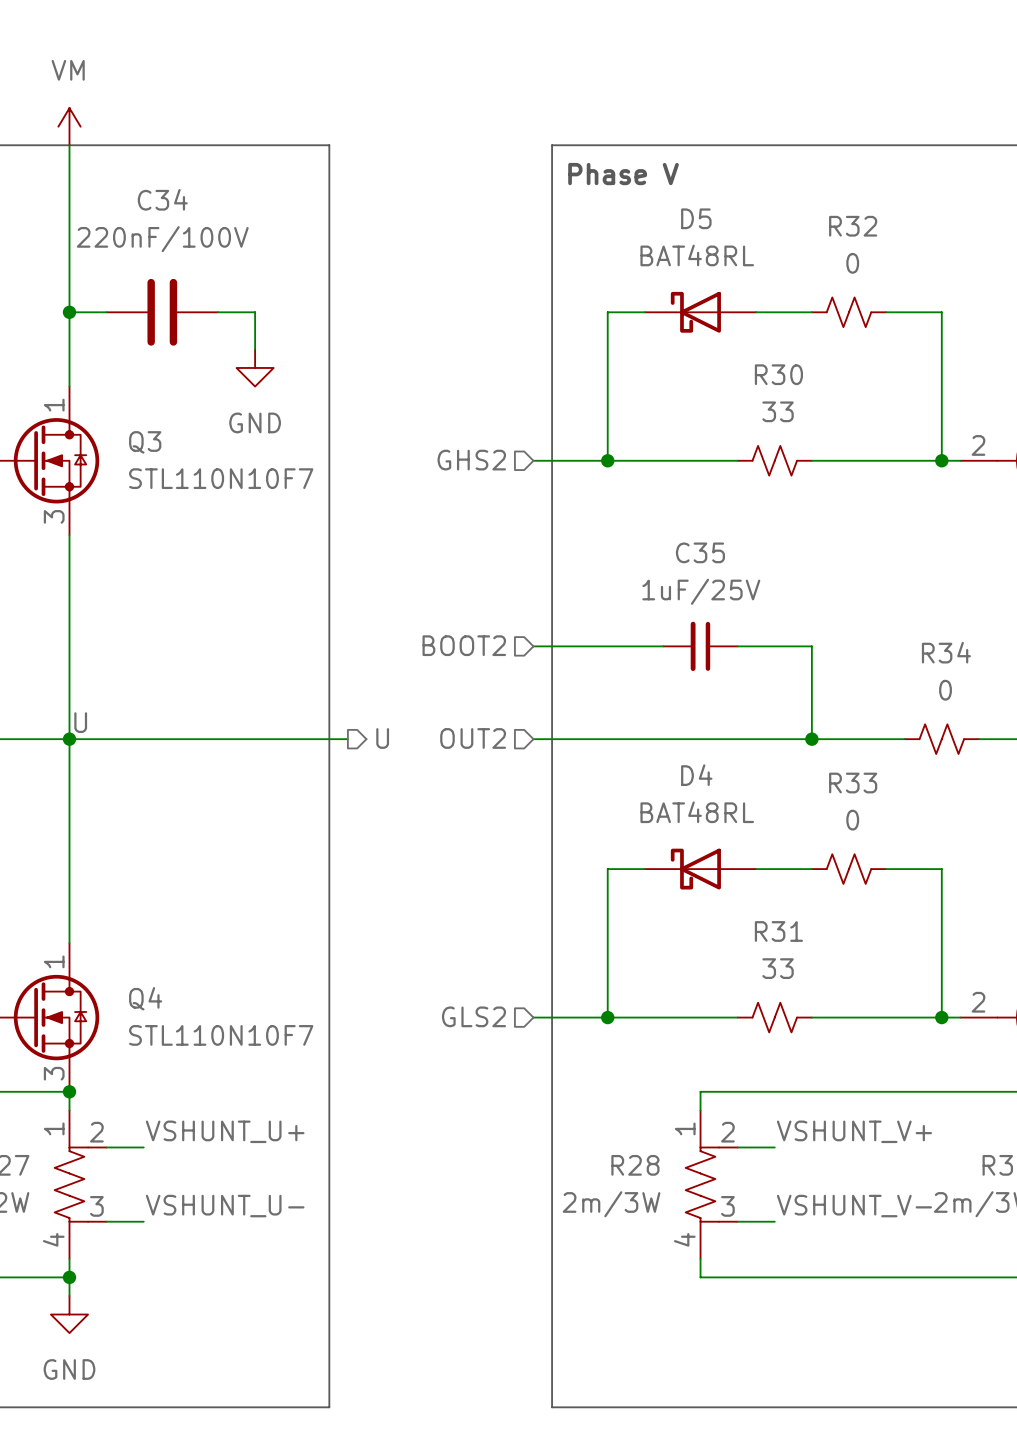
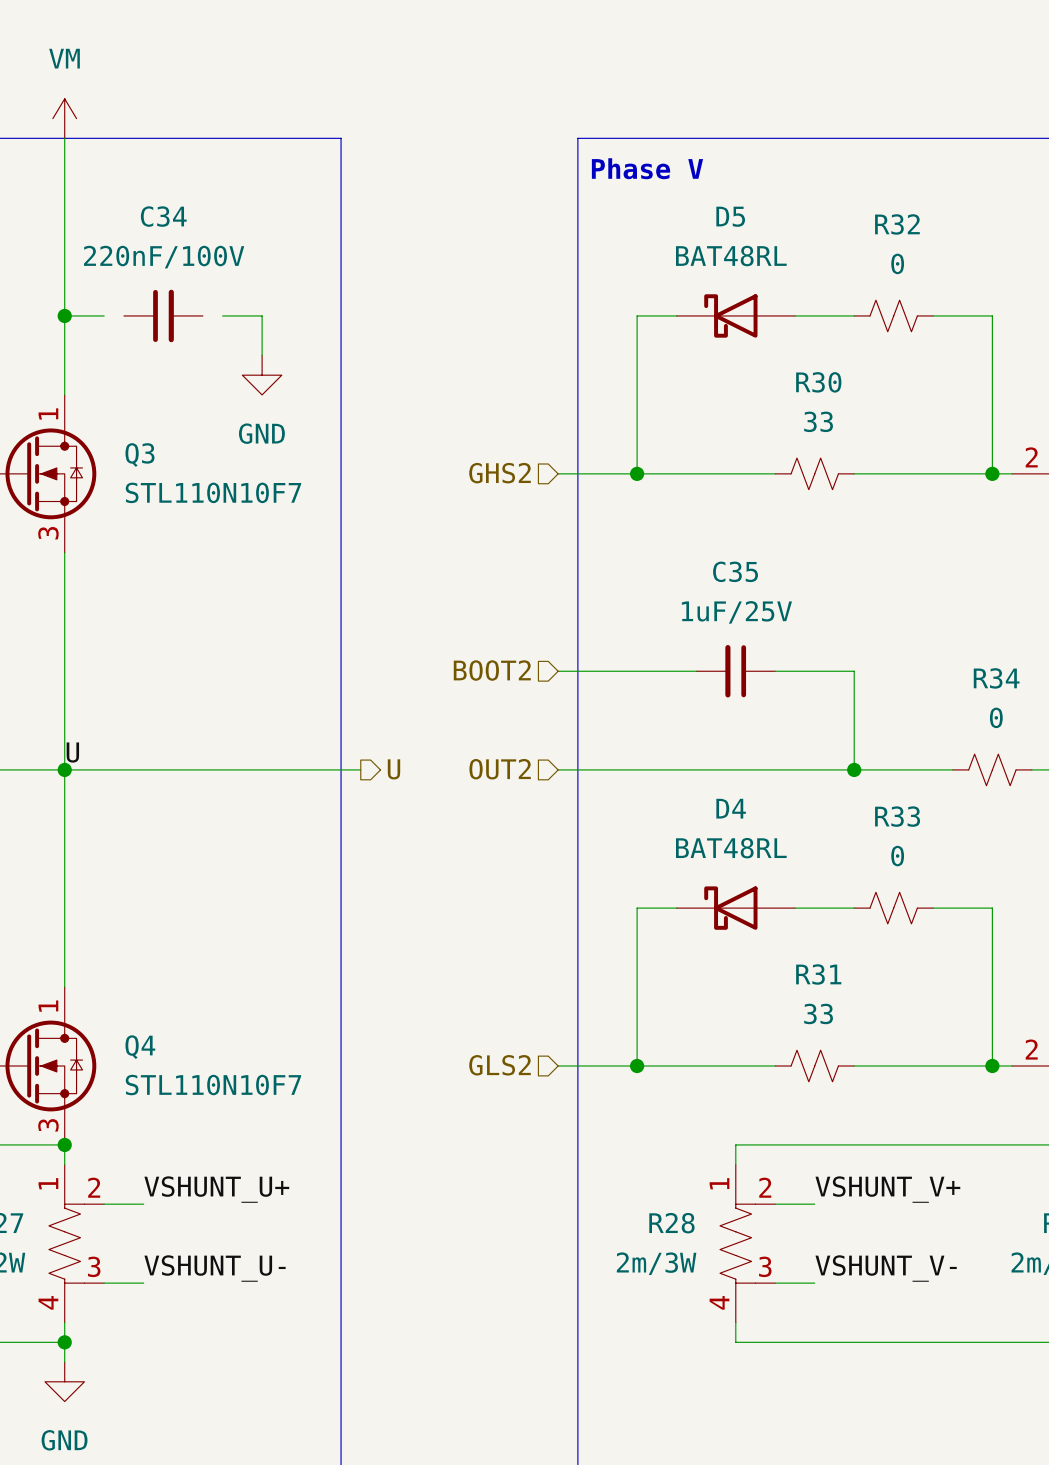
C34 symbol: [106, 278, 218, 346] -> [123, 289, 203, 343]

